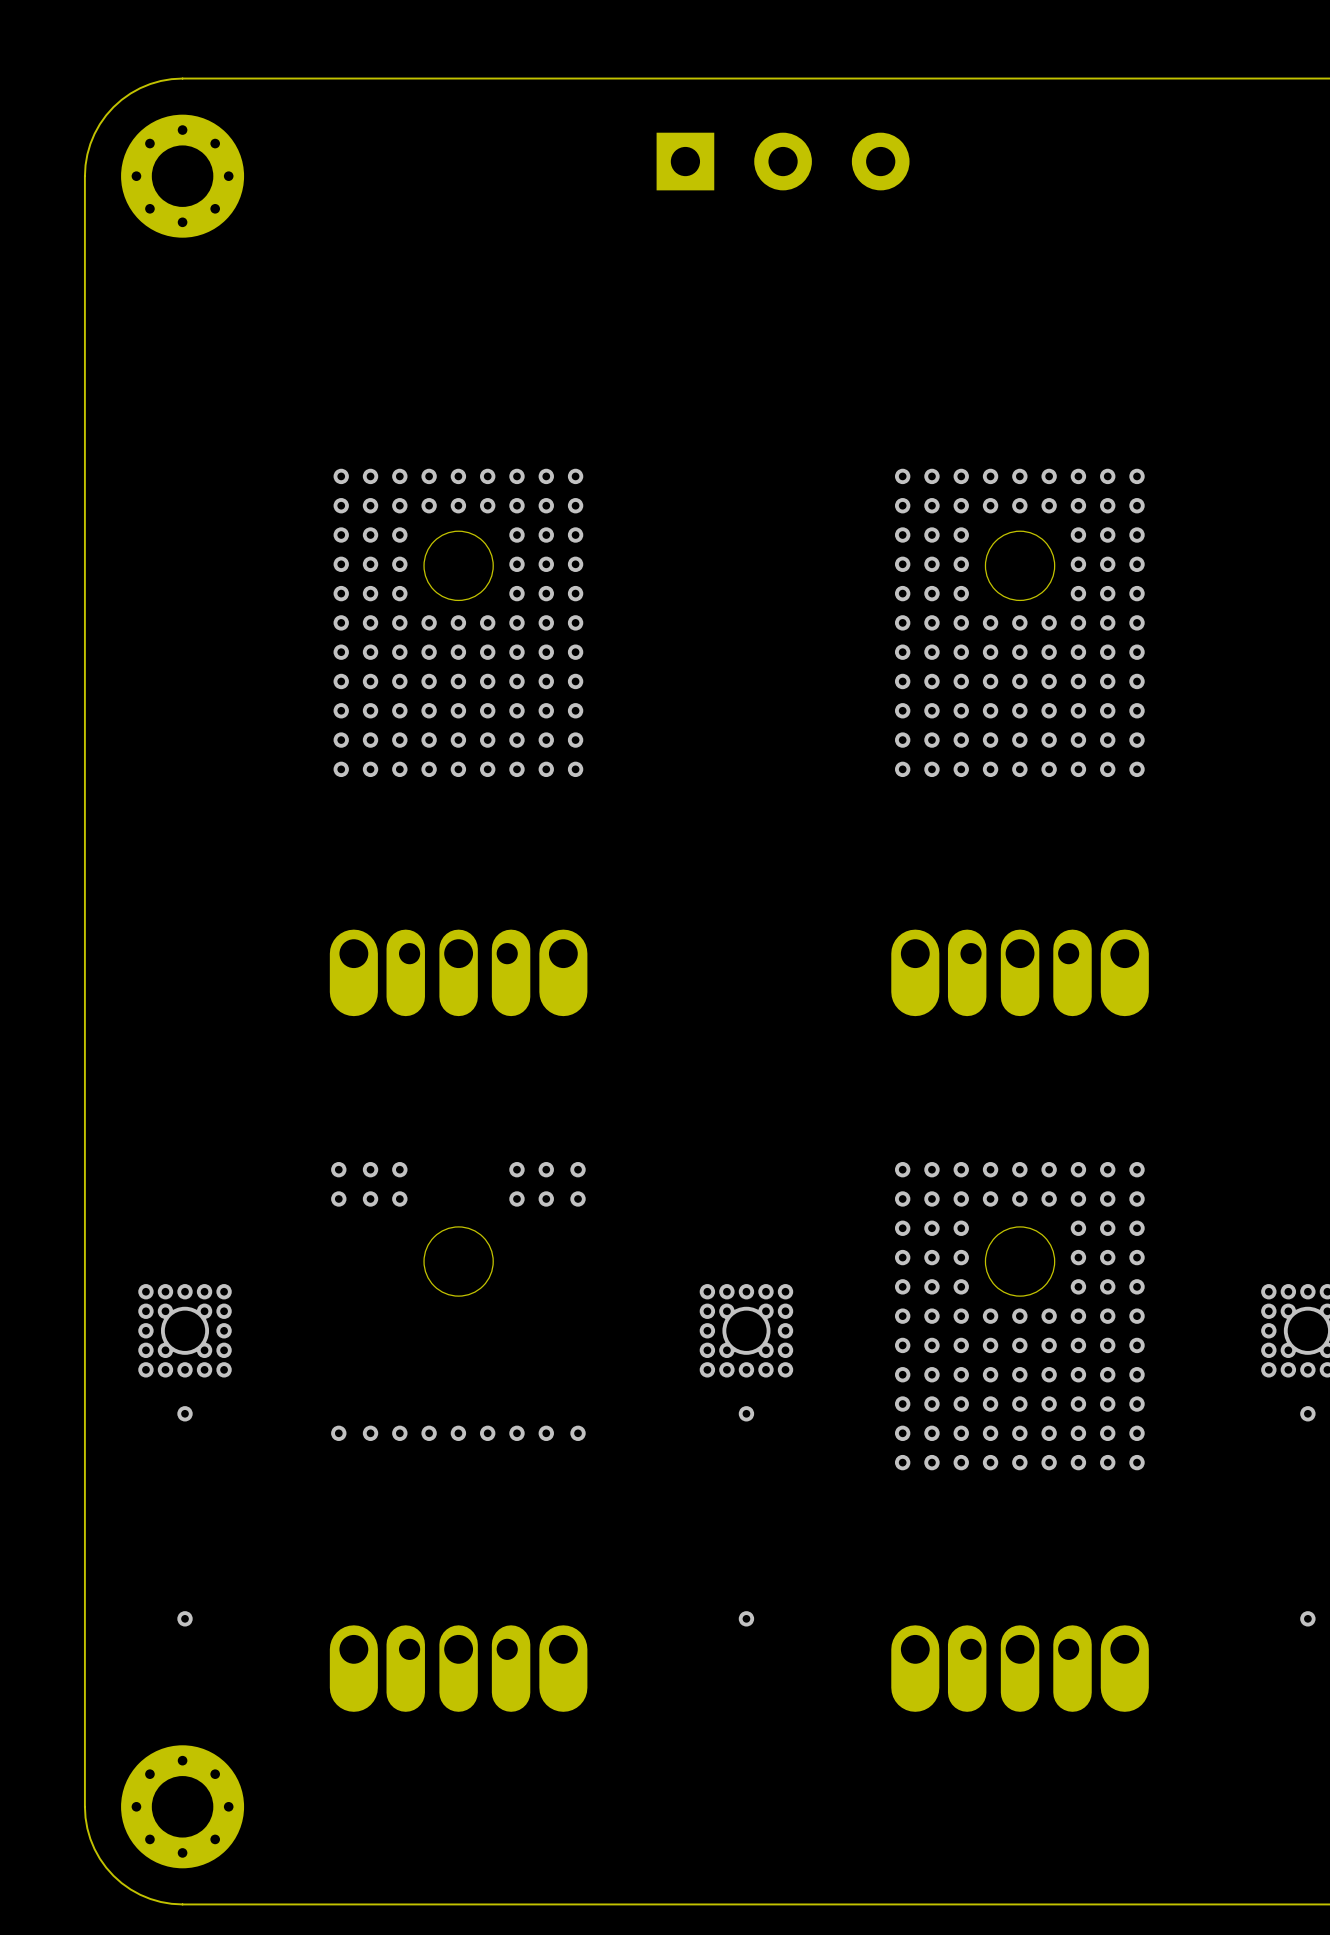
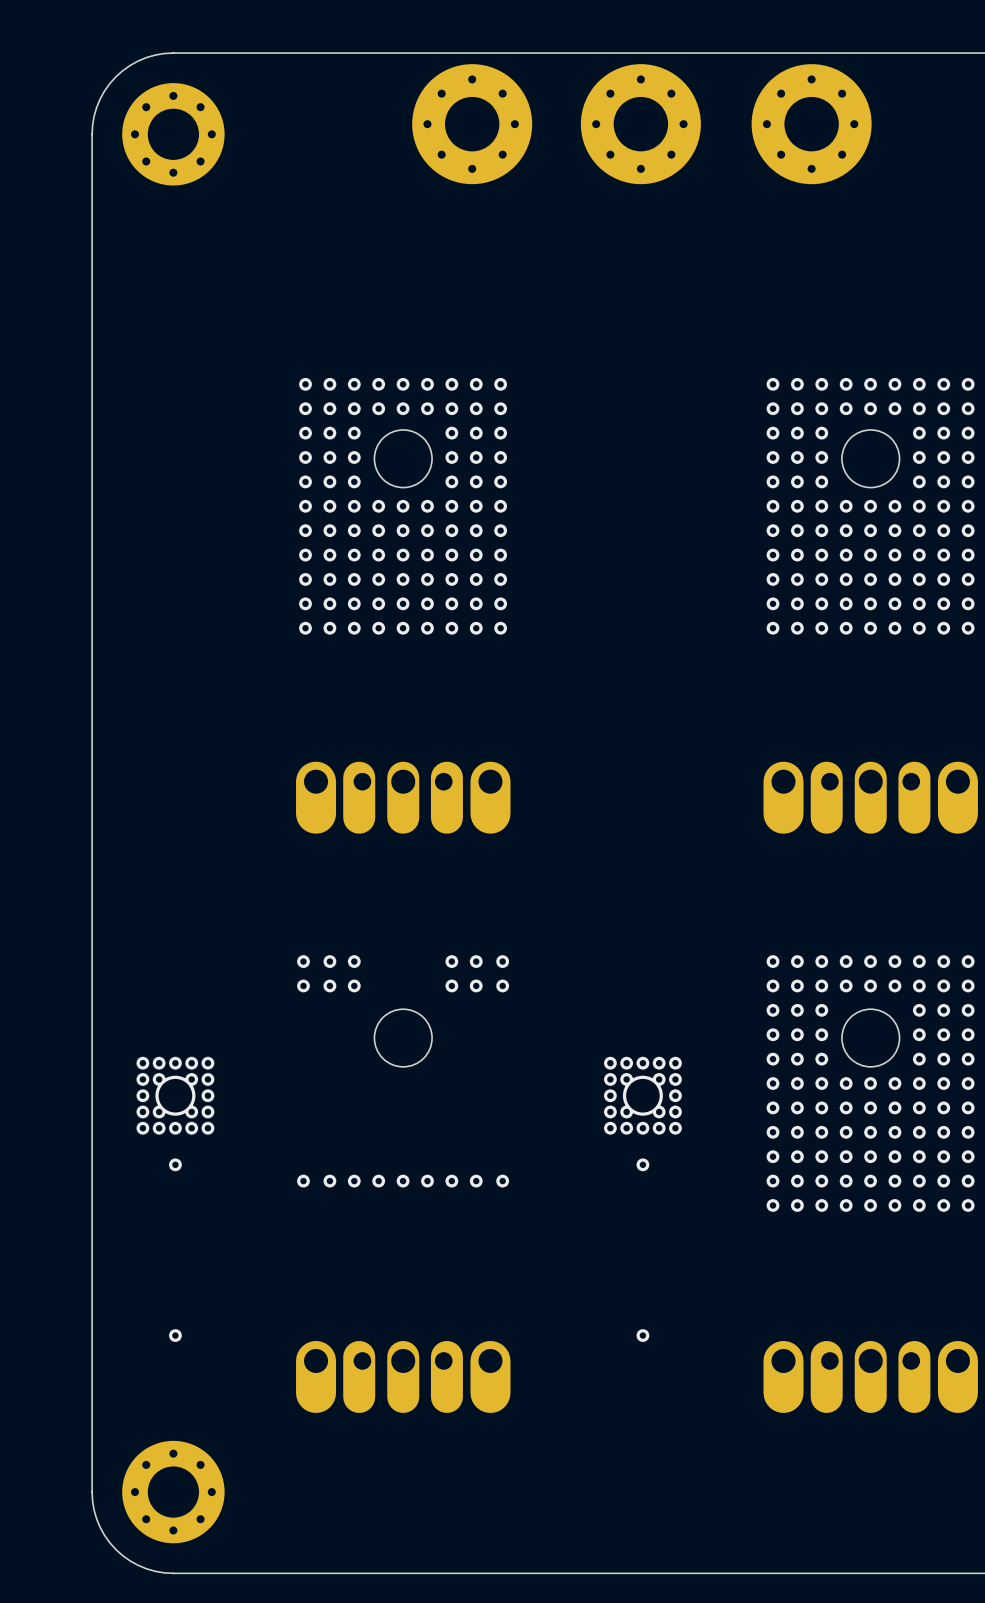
part: (783, 161) -> none
part: none -> (472, 124)
part: none -> (640, 124)
part: none -> (811, 124)

